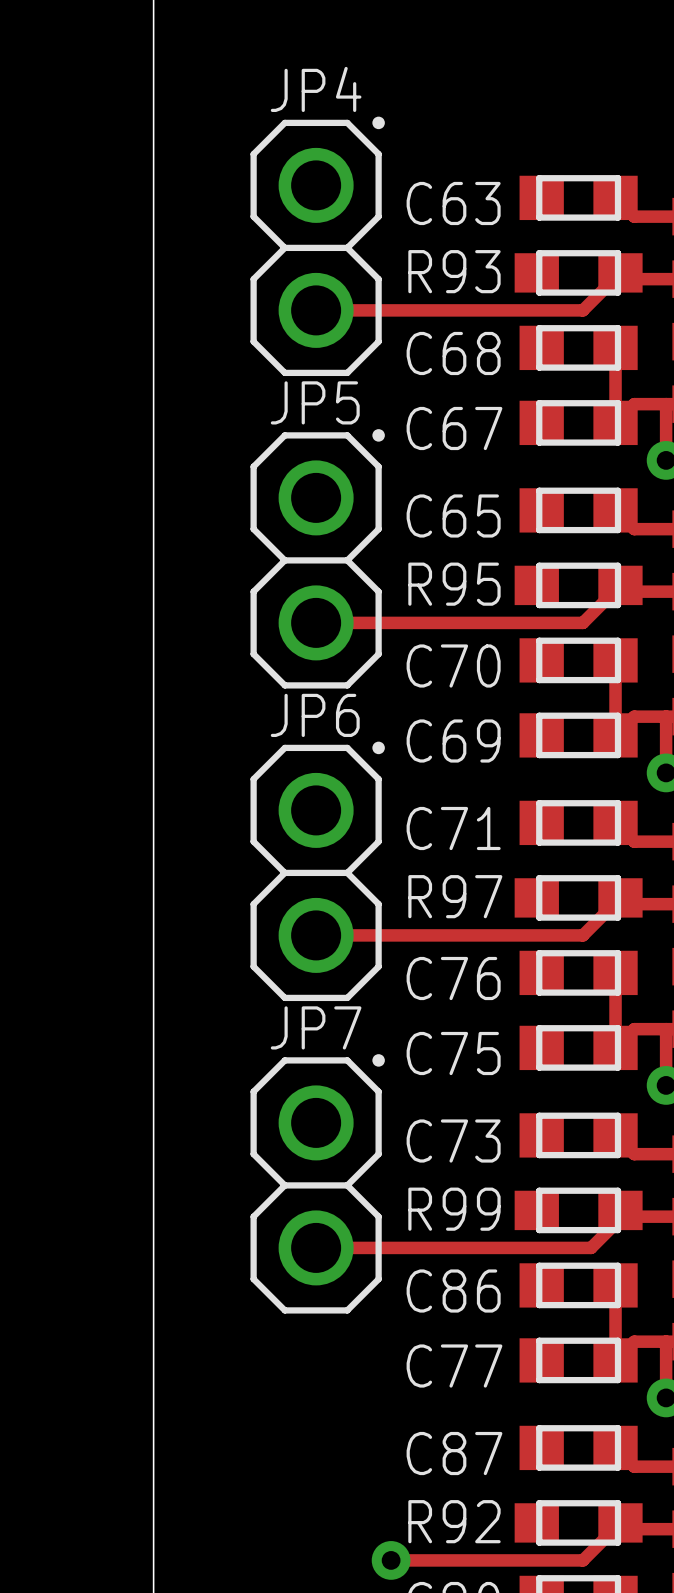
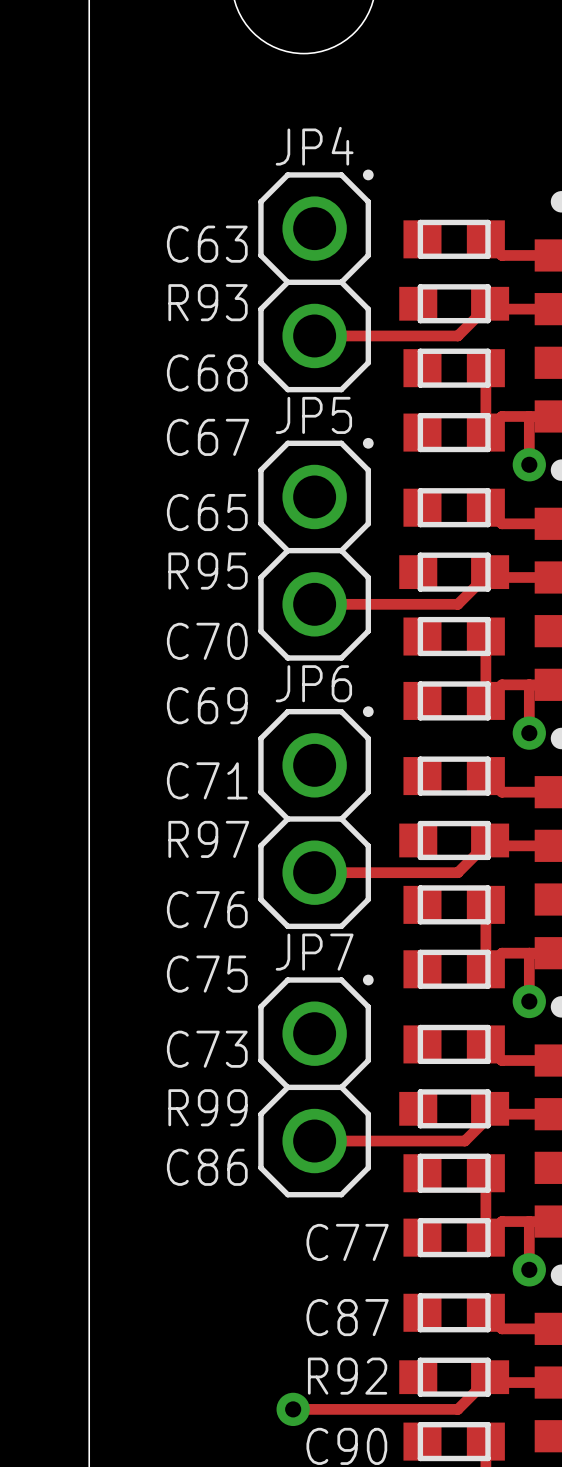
C63 name position: C63 (453, 203) -> C63 (207, 244)
JP4 position: (317, 246) -> (315, 280)
R93 name position: R93 (454, 271) -> R93 (208, 302)
track: (316, 310) (416, 310) -> none
C68 name position: C68 (453, 353) -> C68 (207, 372)
C67 name position: C67 (454, 428) -> C67 (208, 437)
C65 name position: C65 (453, 515) -> C65 (207, 512)
JP5 position: (317, 558) -> (315, 549)
R95 name position: R95 (454, 584) -> R95 (208, 571)
track: (316, 622) (416, 622) -> none
C70 name position: C70 (453, 665) -> C70 (207, 641)
C69 name position: C69 (453, 741) -> C69 (207, 705)
C71 name position: C71 (453, 828) -> C71 (207, 780)
JP6 position: (317, 871) -> (315, 817)
R97 name position: R97 (455, 896) -> R97 (208, 839)
track: (316, 935) (416, 935) -> none
C76 name position: C76 (453, 978) -> C76 (207, 909)
C75 name position: C75 (453, 1053) -> C75 (207, 974)
C73 name position: C73 (453, 1141) -> C73 (207, 1049)
JP7 position: (317, 1183) -> (315, 1086)
R99 name position: R99 (454, 1209) -> R99 (208, 1107)
track: (316, 1247) (416, 1247) -> none
C86 name position: C86 (453, 1291) -> C86 (207, 1167)

